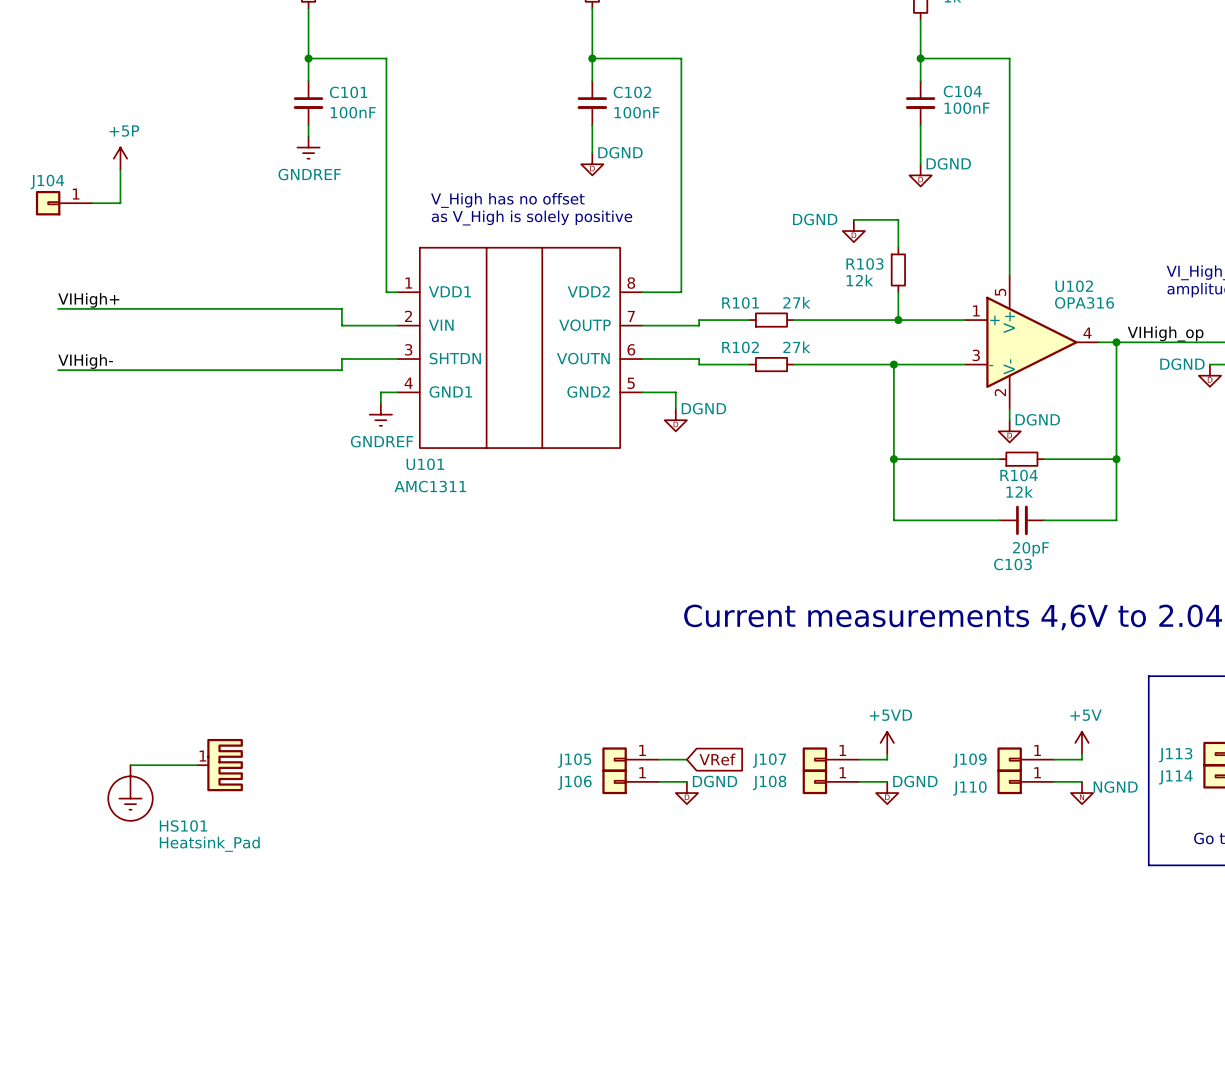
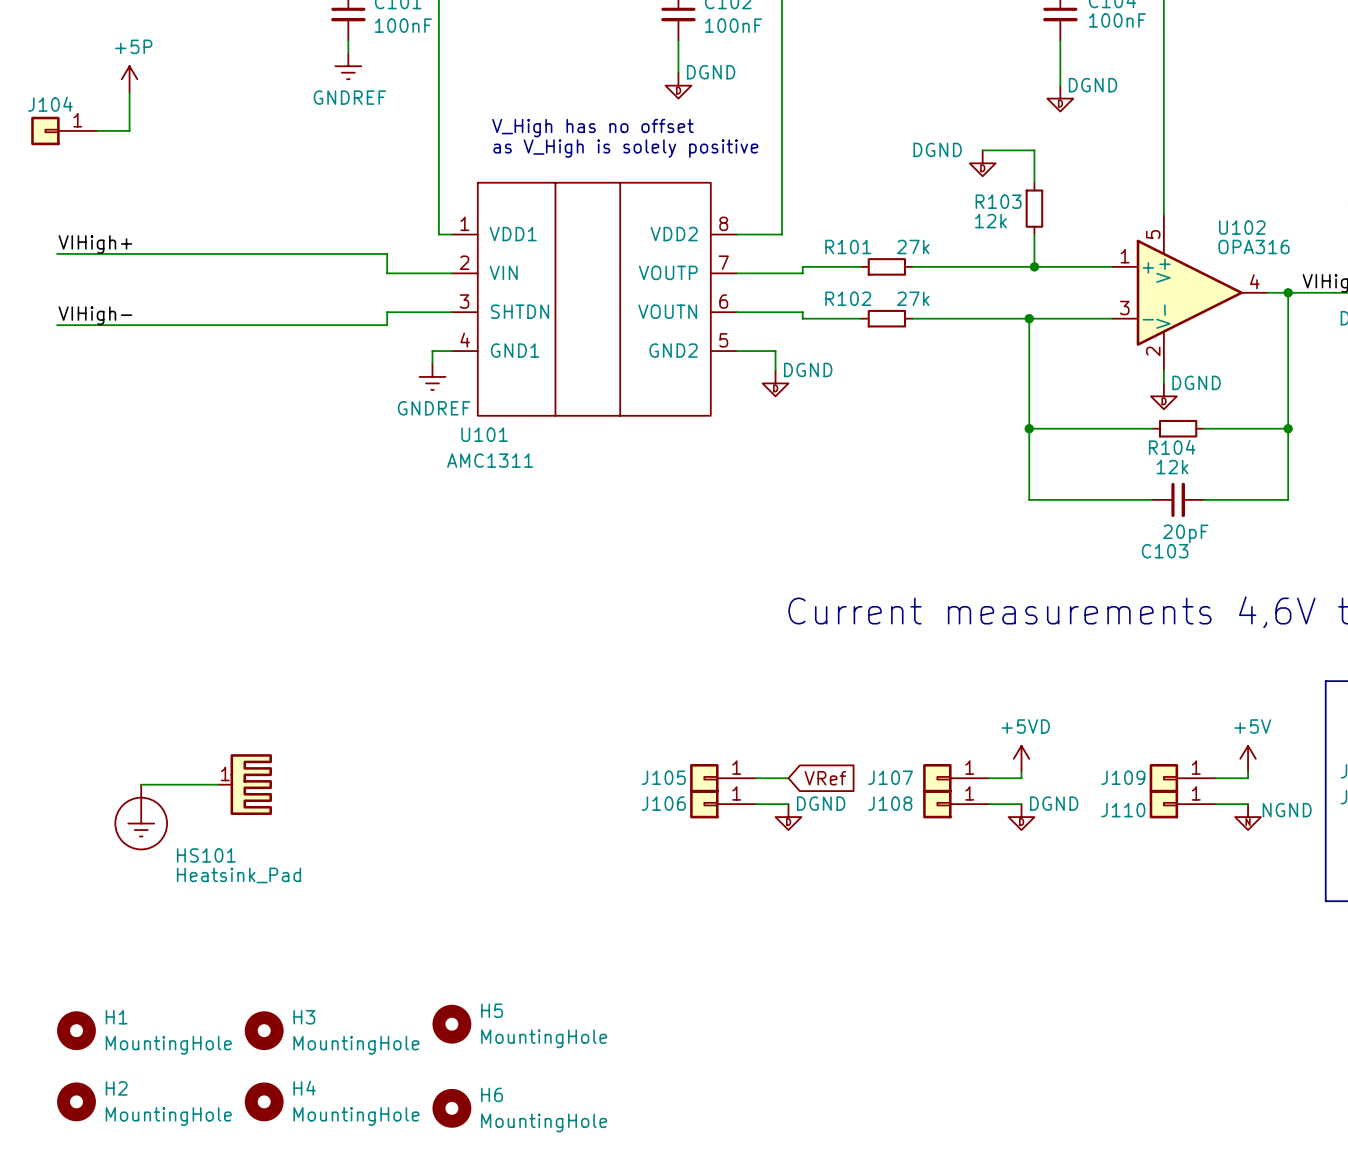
H5: none -> MountingHole (451, 1024)
H1: none -> MountingHole (76, 1030)
H3: none -> MountingHole (264, 1030)
H2: none -> MountingHole (76, 1101)
H4: none -> MountingHole (264, 1101)
H6: none -> MountingHole (451, 1108)

